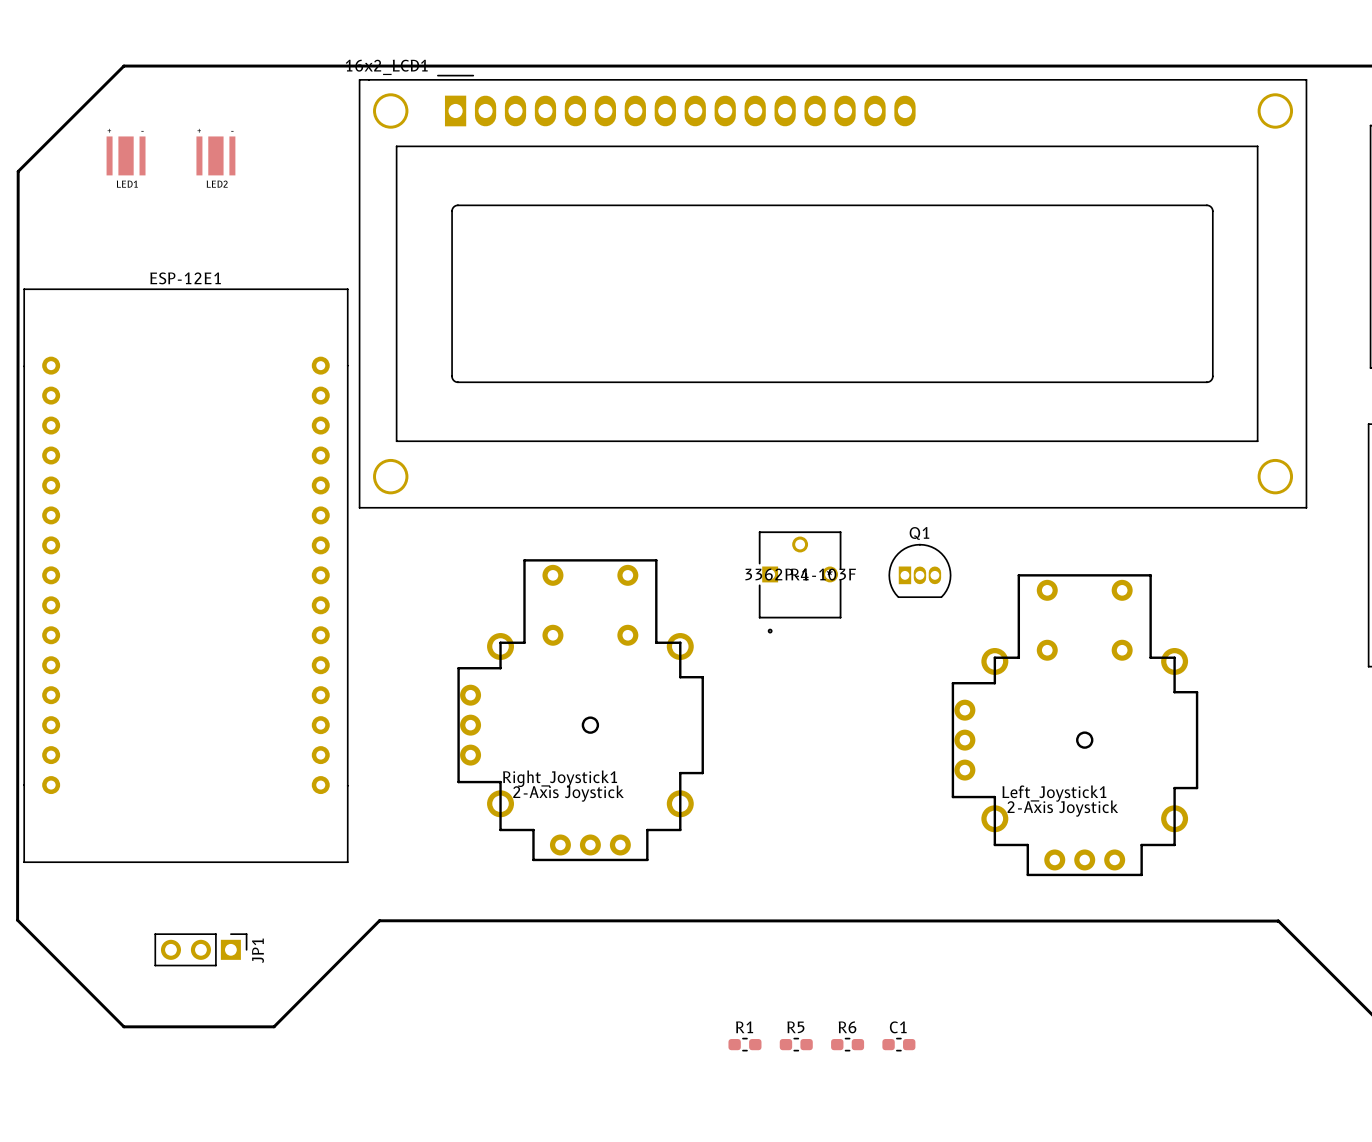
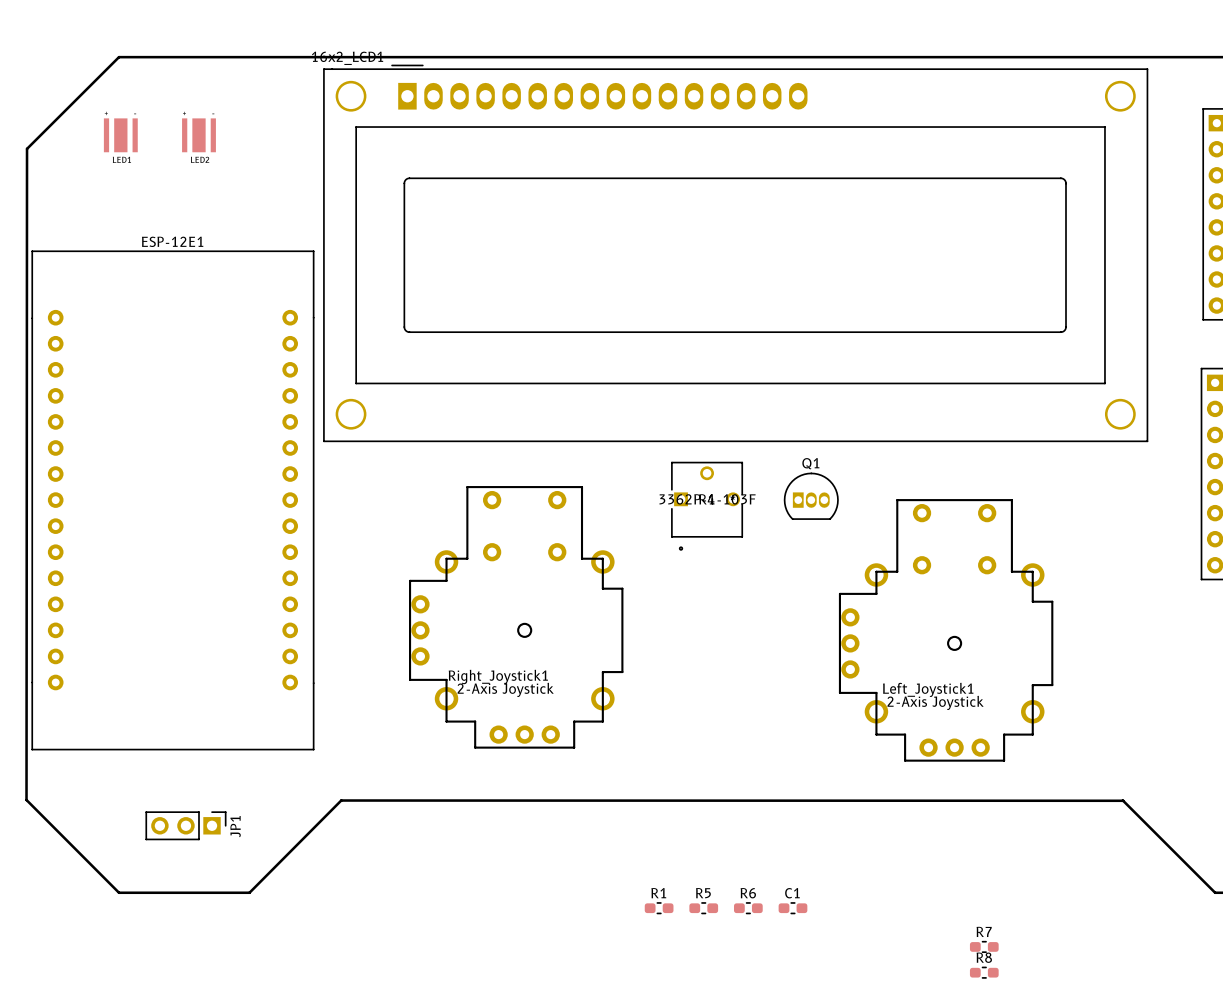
R7: none -> (984, 946)
R8: none -> (984, 972)

